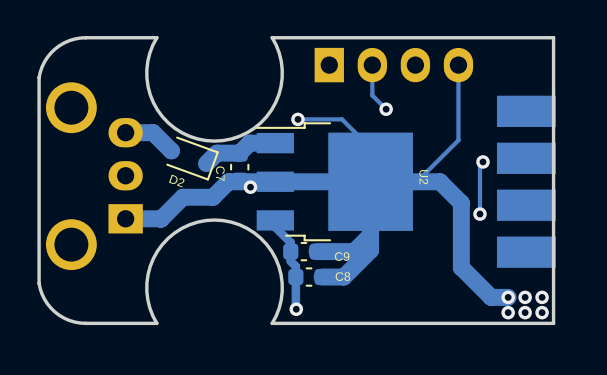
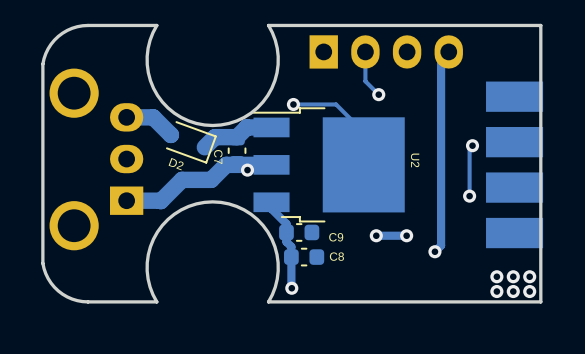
track: none -> (443, 49) (441, 51) (441, 245) (434, 251)
track: (458, 65) (458, 140) (416, 181) (370, 181) (370, 250) (343, 277) (322, 277) -> none
track: (283, 181) (440, 181) (461, 203) (461, 267) (491, 297) (508, 297) -> none
track: (370, 235) (354, 251) (317, 251) -> none
via: none -> (376, 235)
track: none -> (406, 235) (379, 235)
via: none -> (406, 235)
via: none -> (434, 251)

